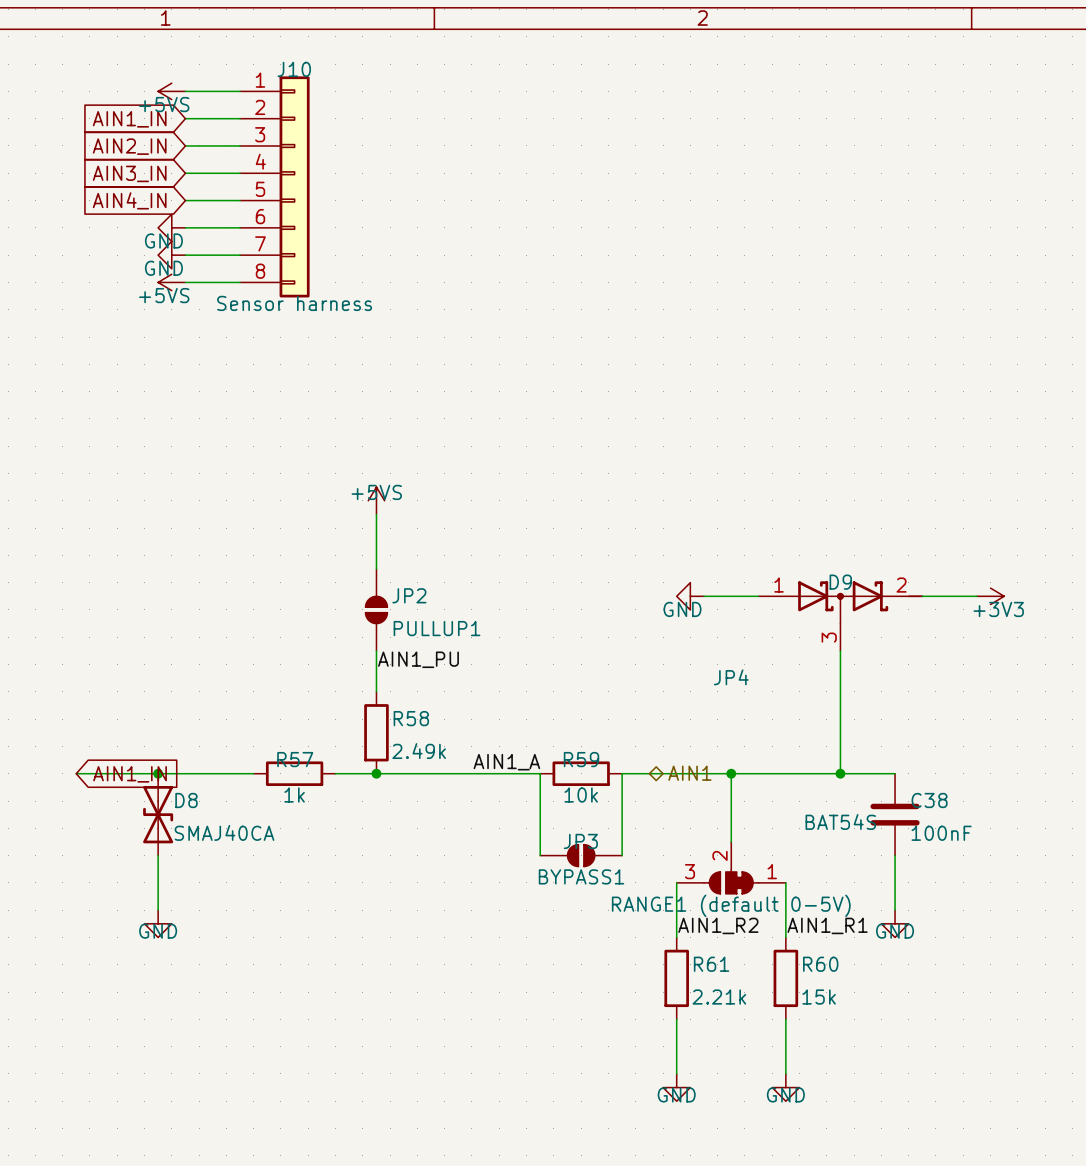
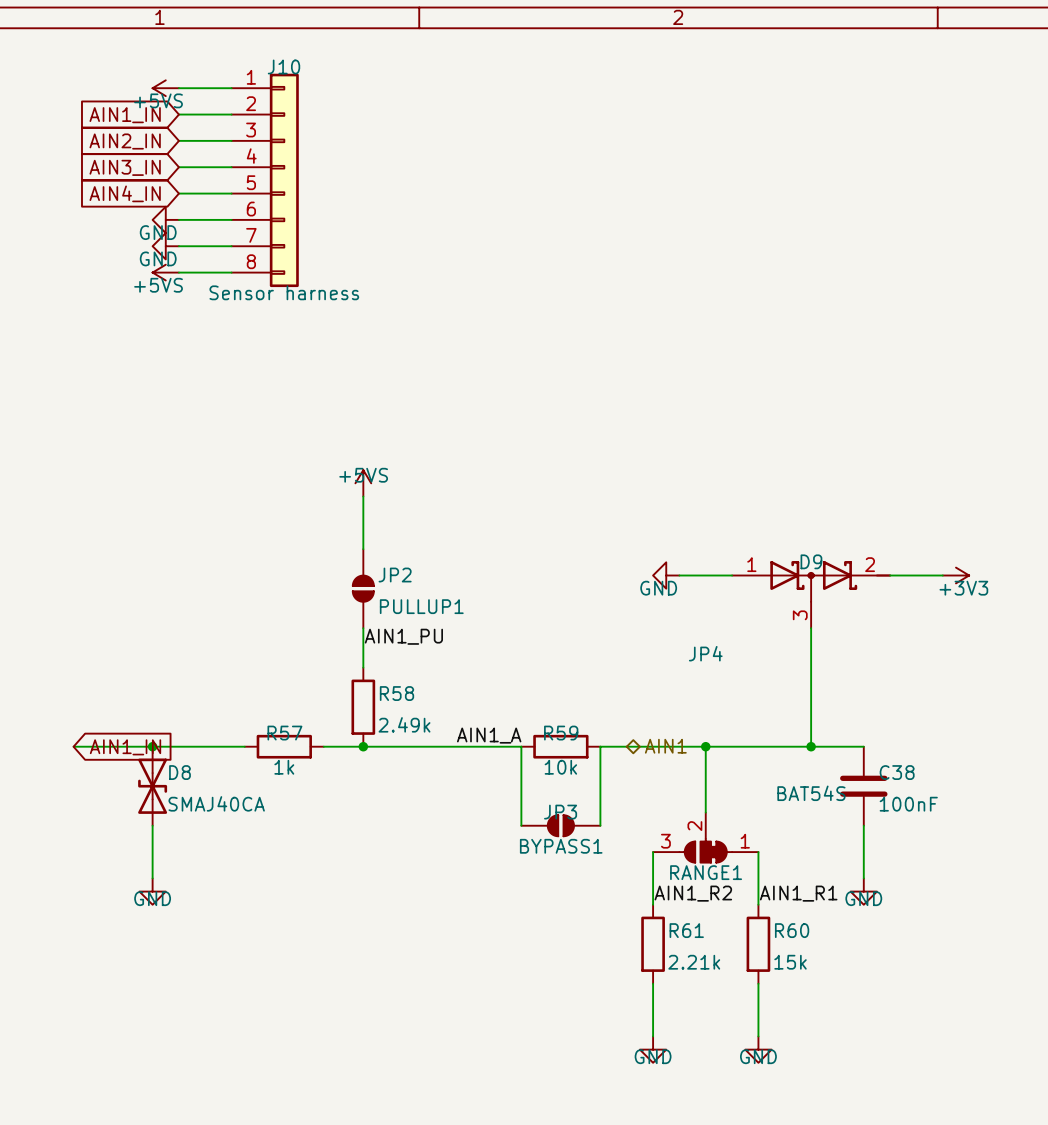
JP4 value: RANGE1 (default 0-5V) (731, 905) -> RANGE1 (706, 872)

